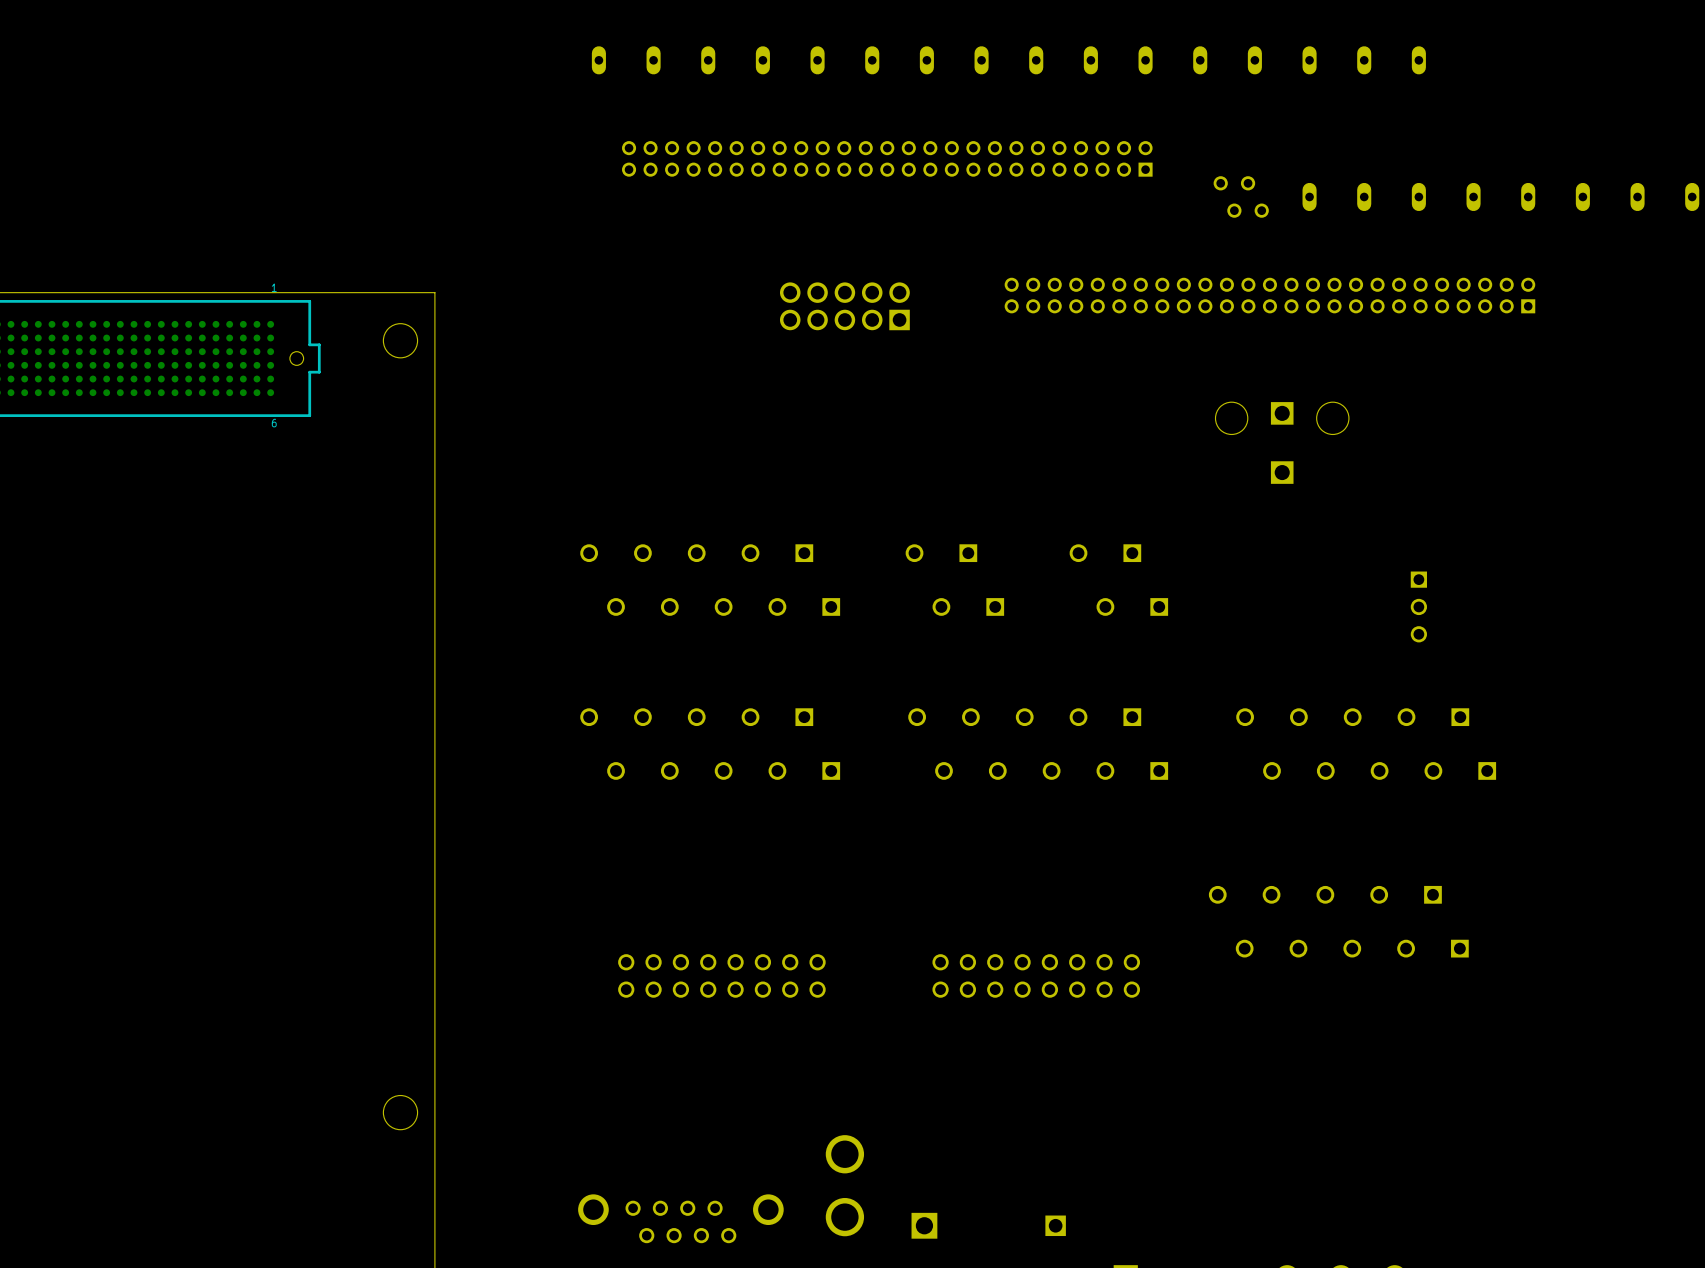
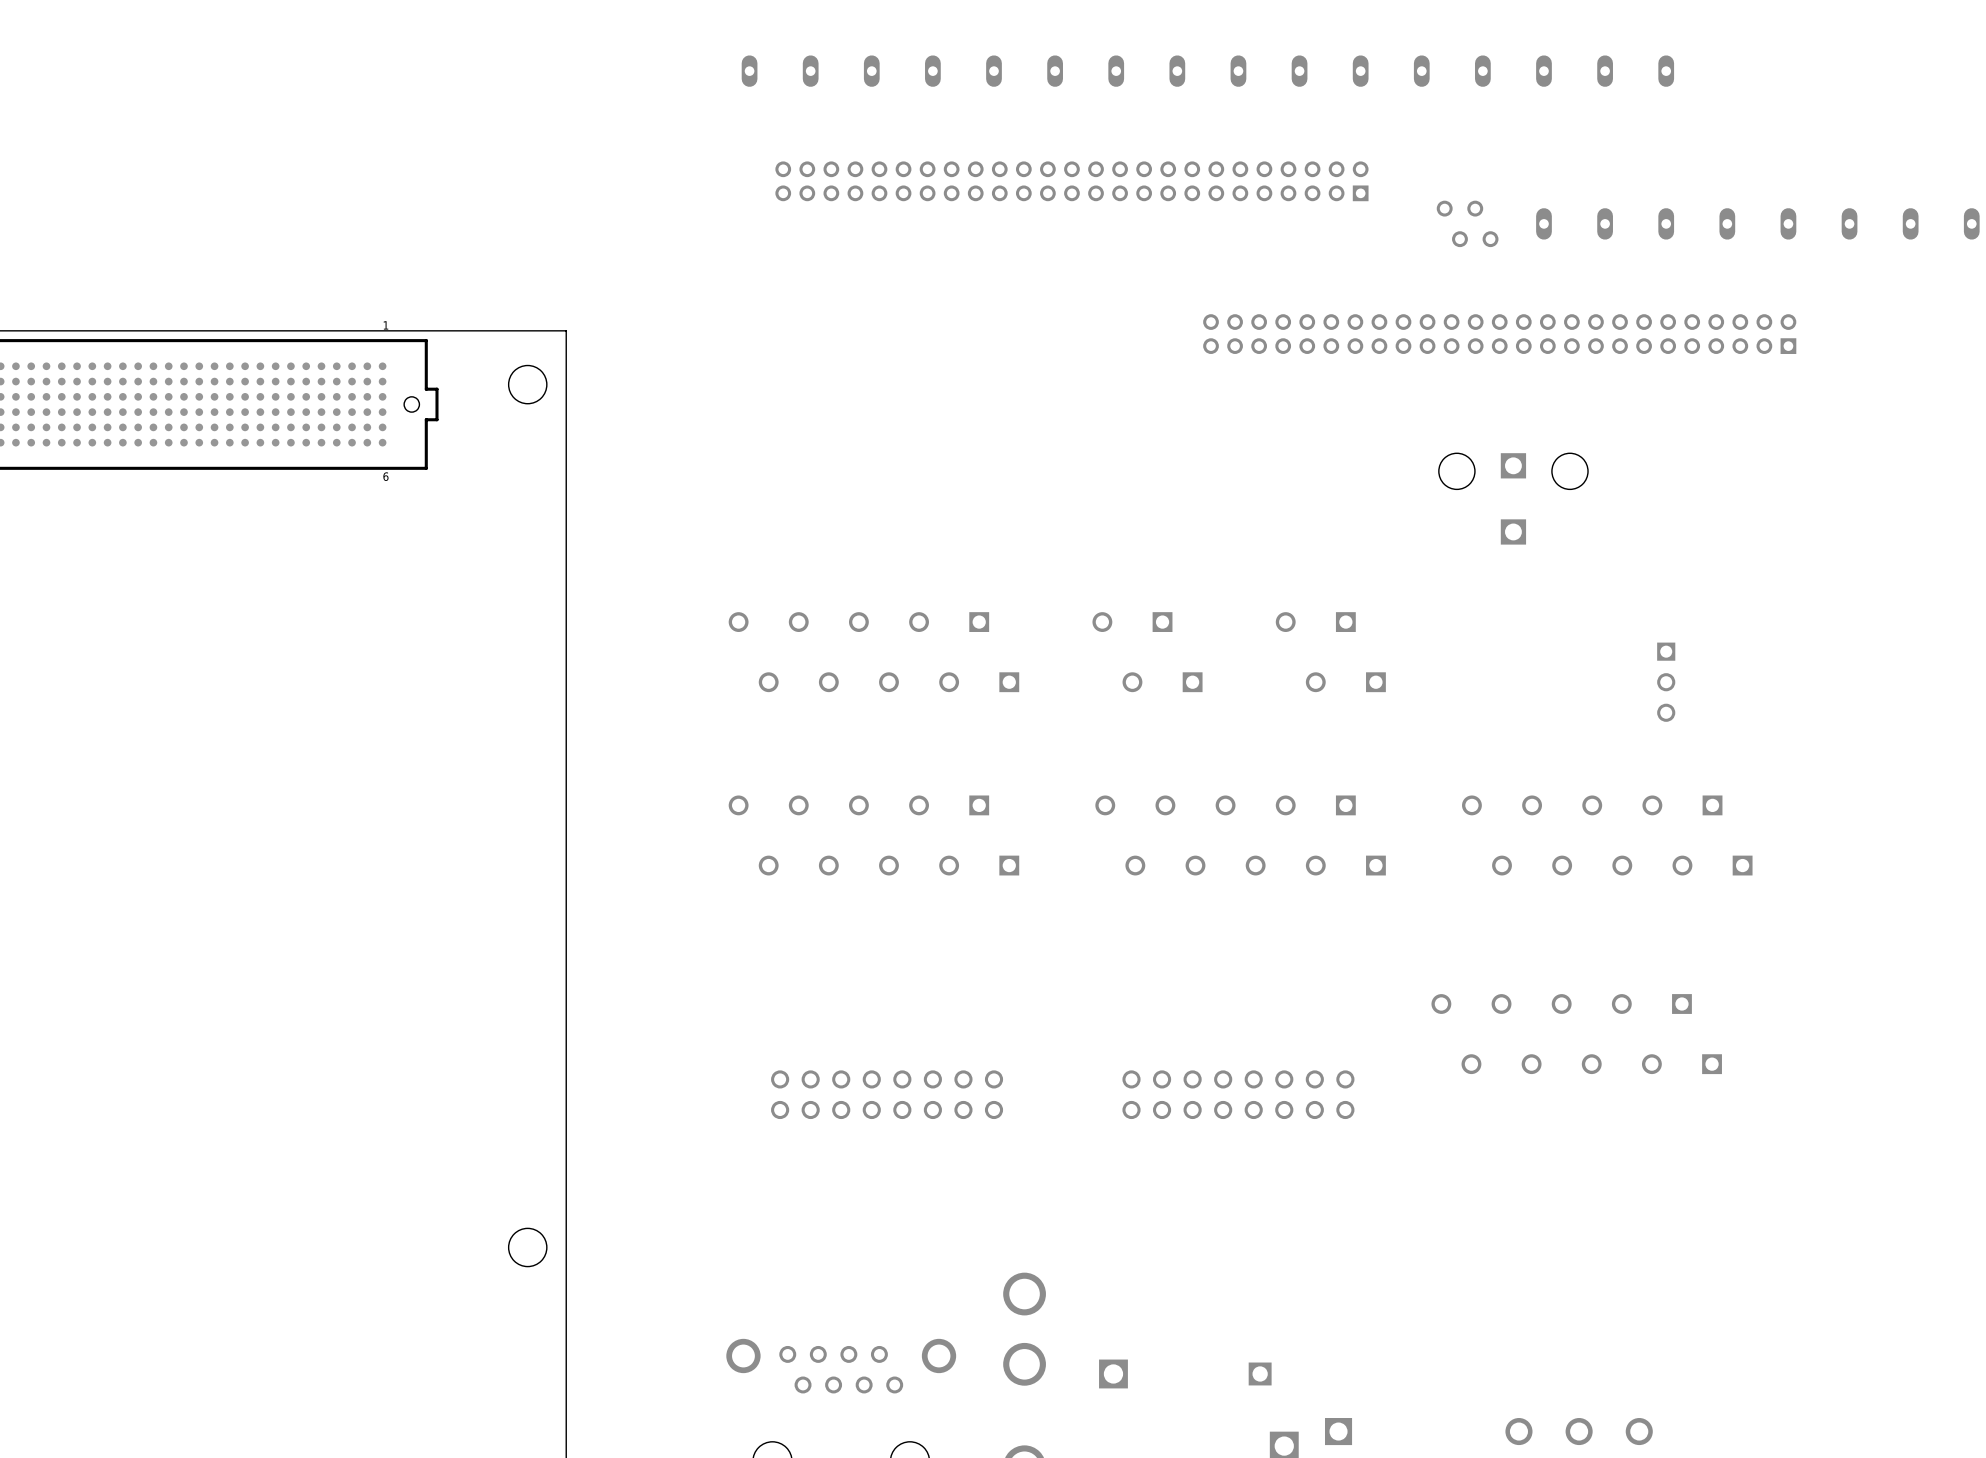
part: (844, 306) -> none

